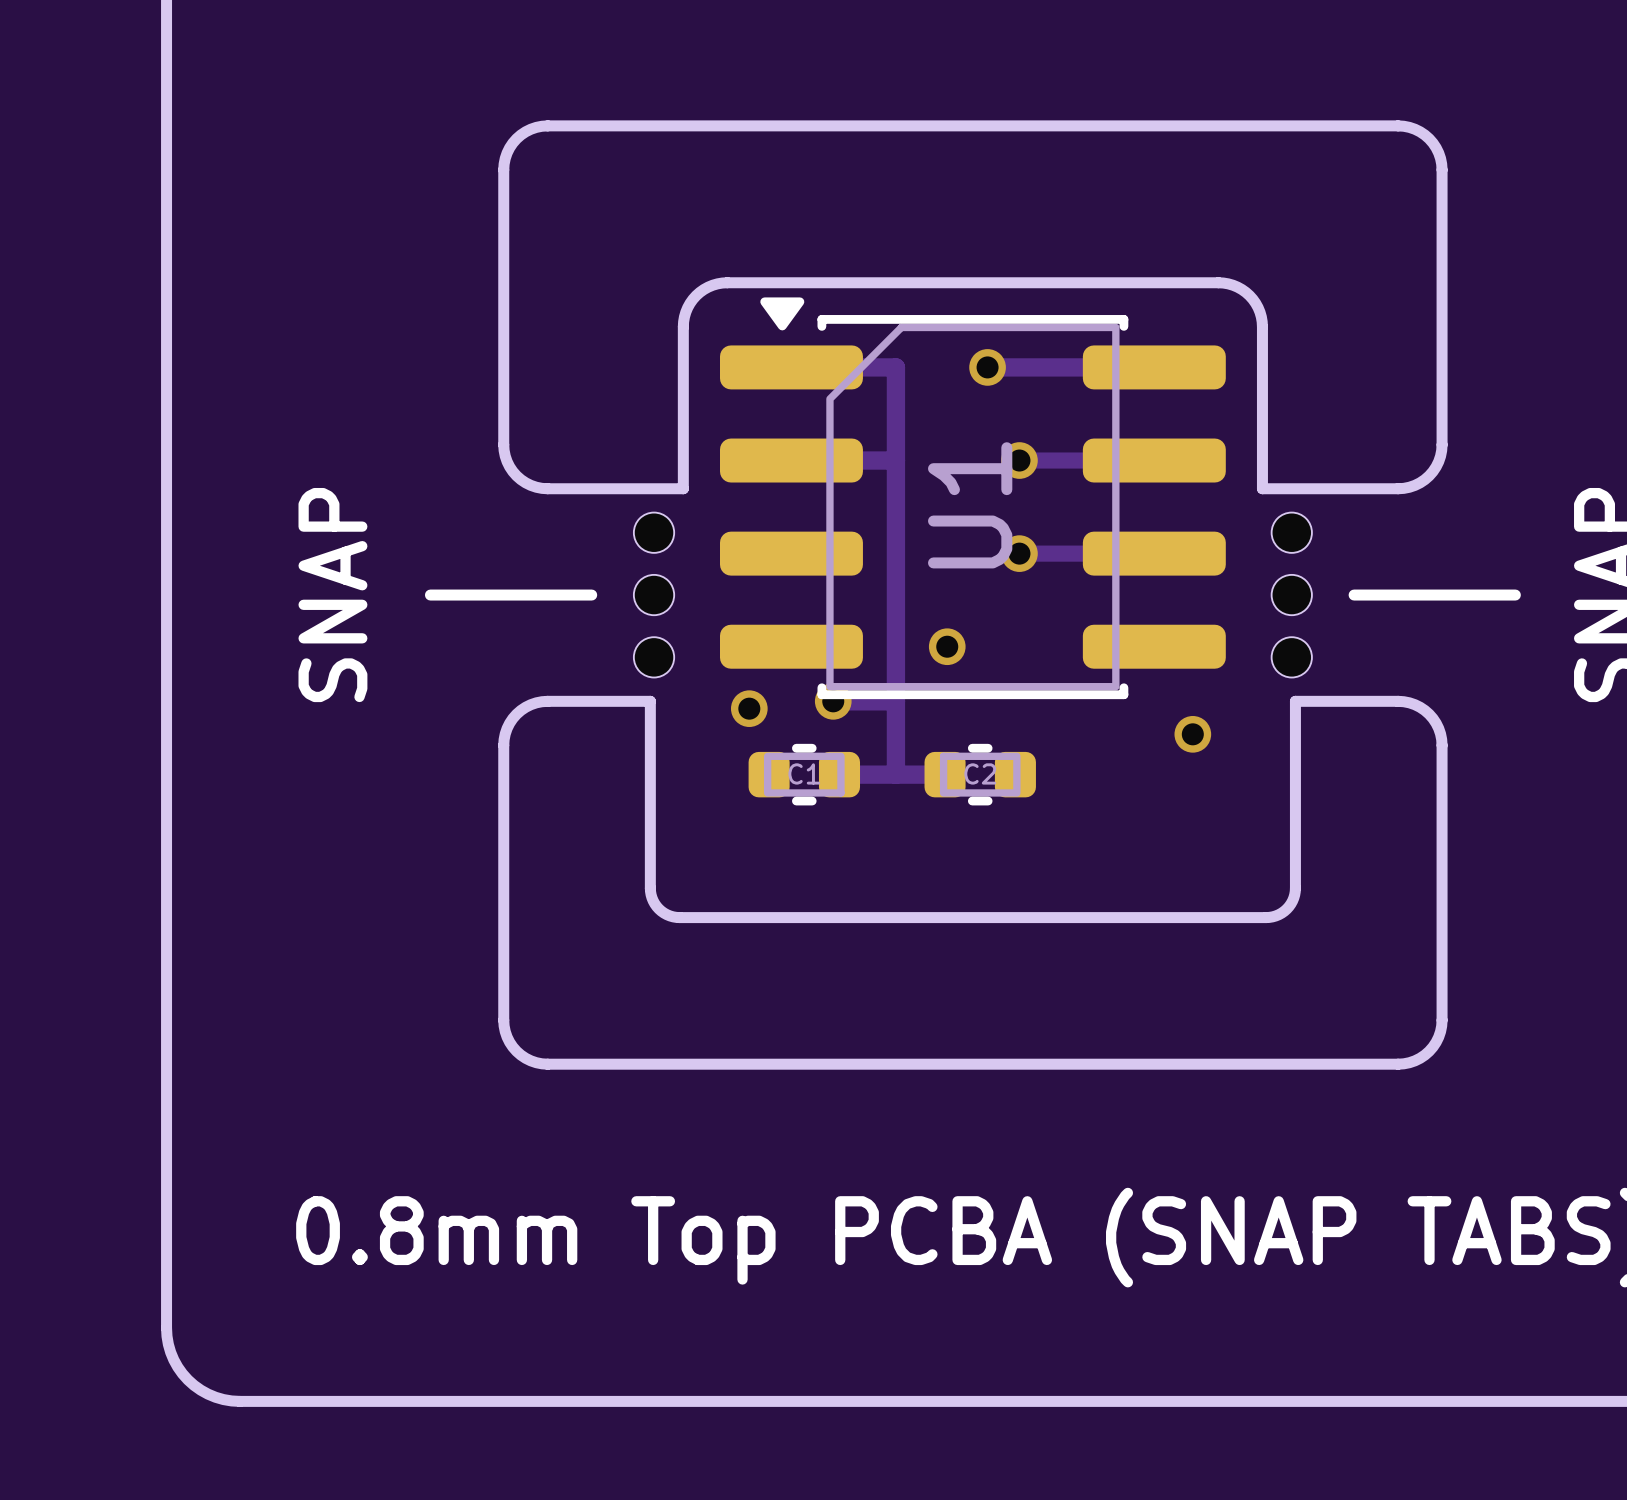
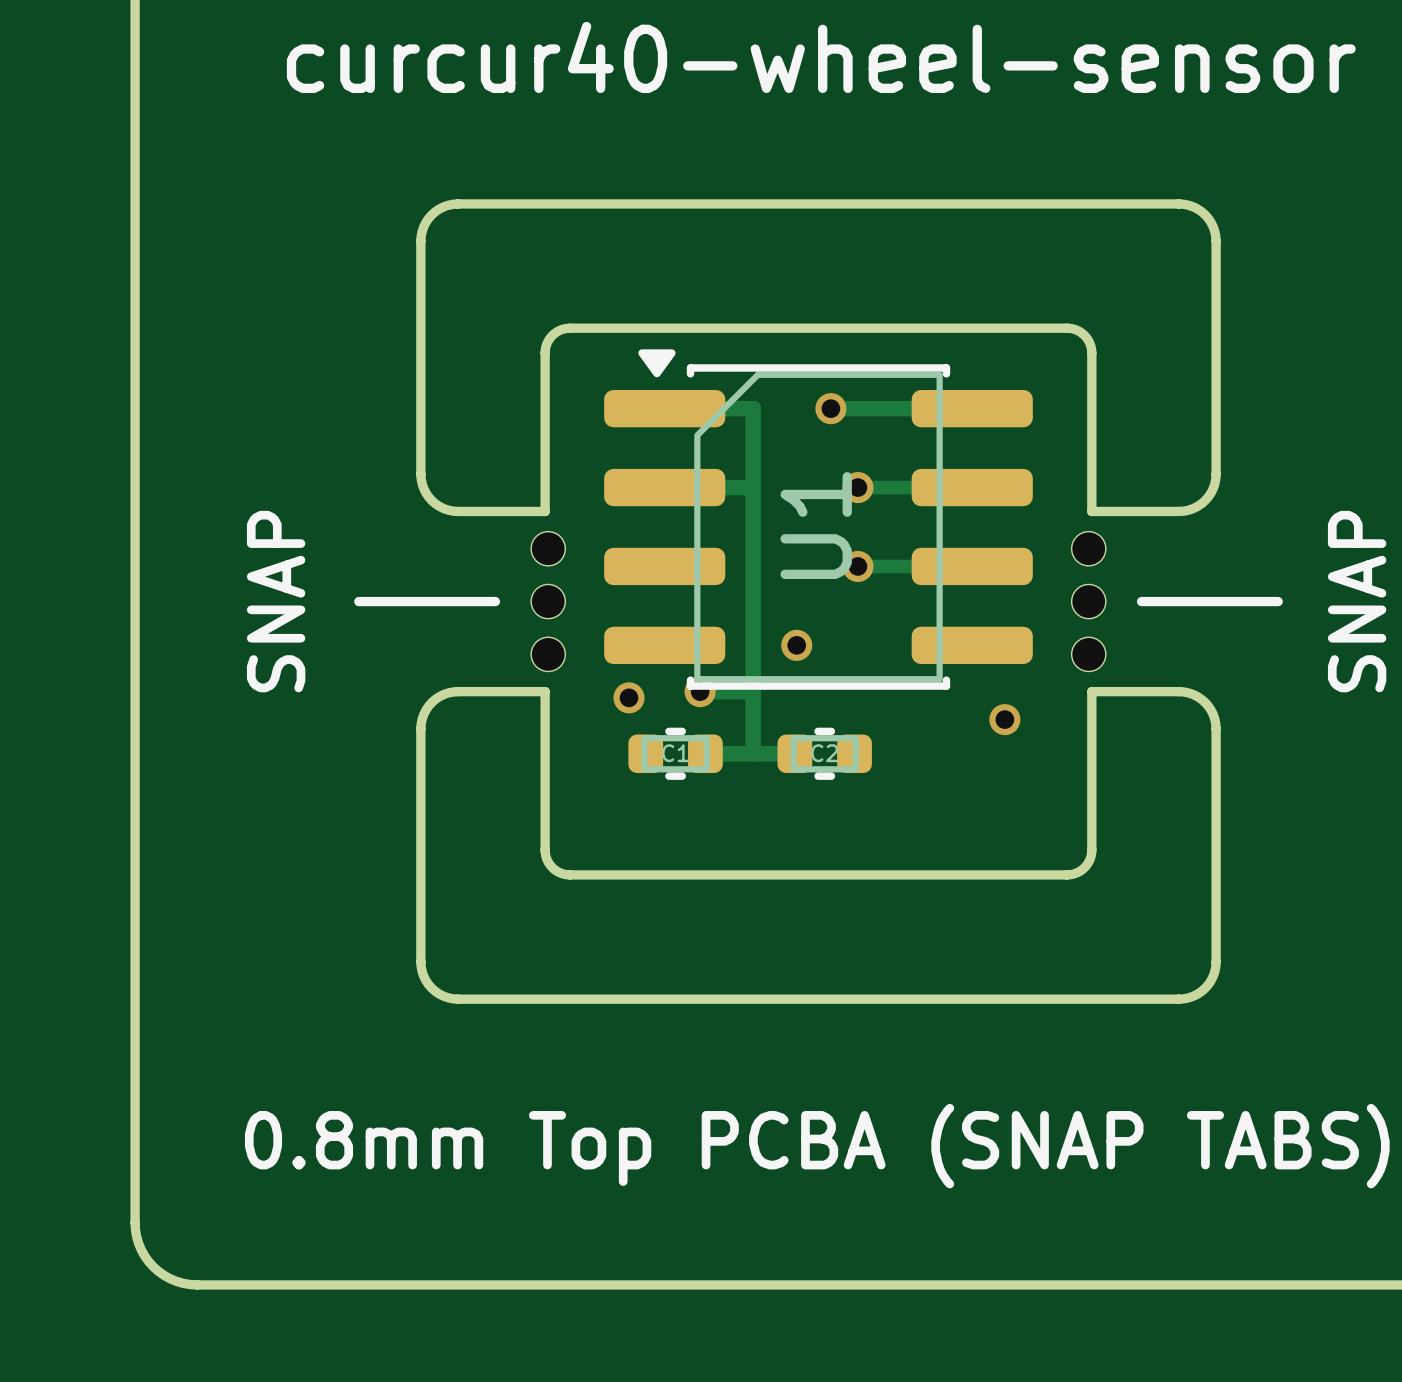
board edge: (650, 488) (683, 488) (684, 316) (690, 303) (699, 292) (712, 285) (727, 282) (1218, 282) (1233, 285) (1241, 289) (1252, 299) (1258, 307) (1262, 321) (1262, 488) (1295, 488) -> (545, 511) (545, 350) (552, 335) (559, 330) (569, 328) (1075, 329) (1086, 337) (1091, 350) (1091, 511)

